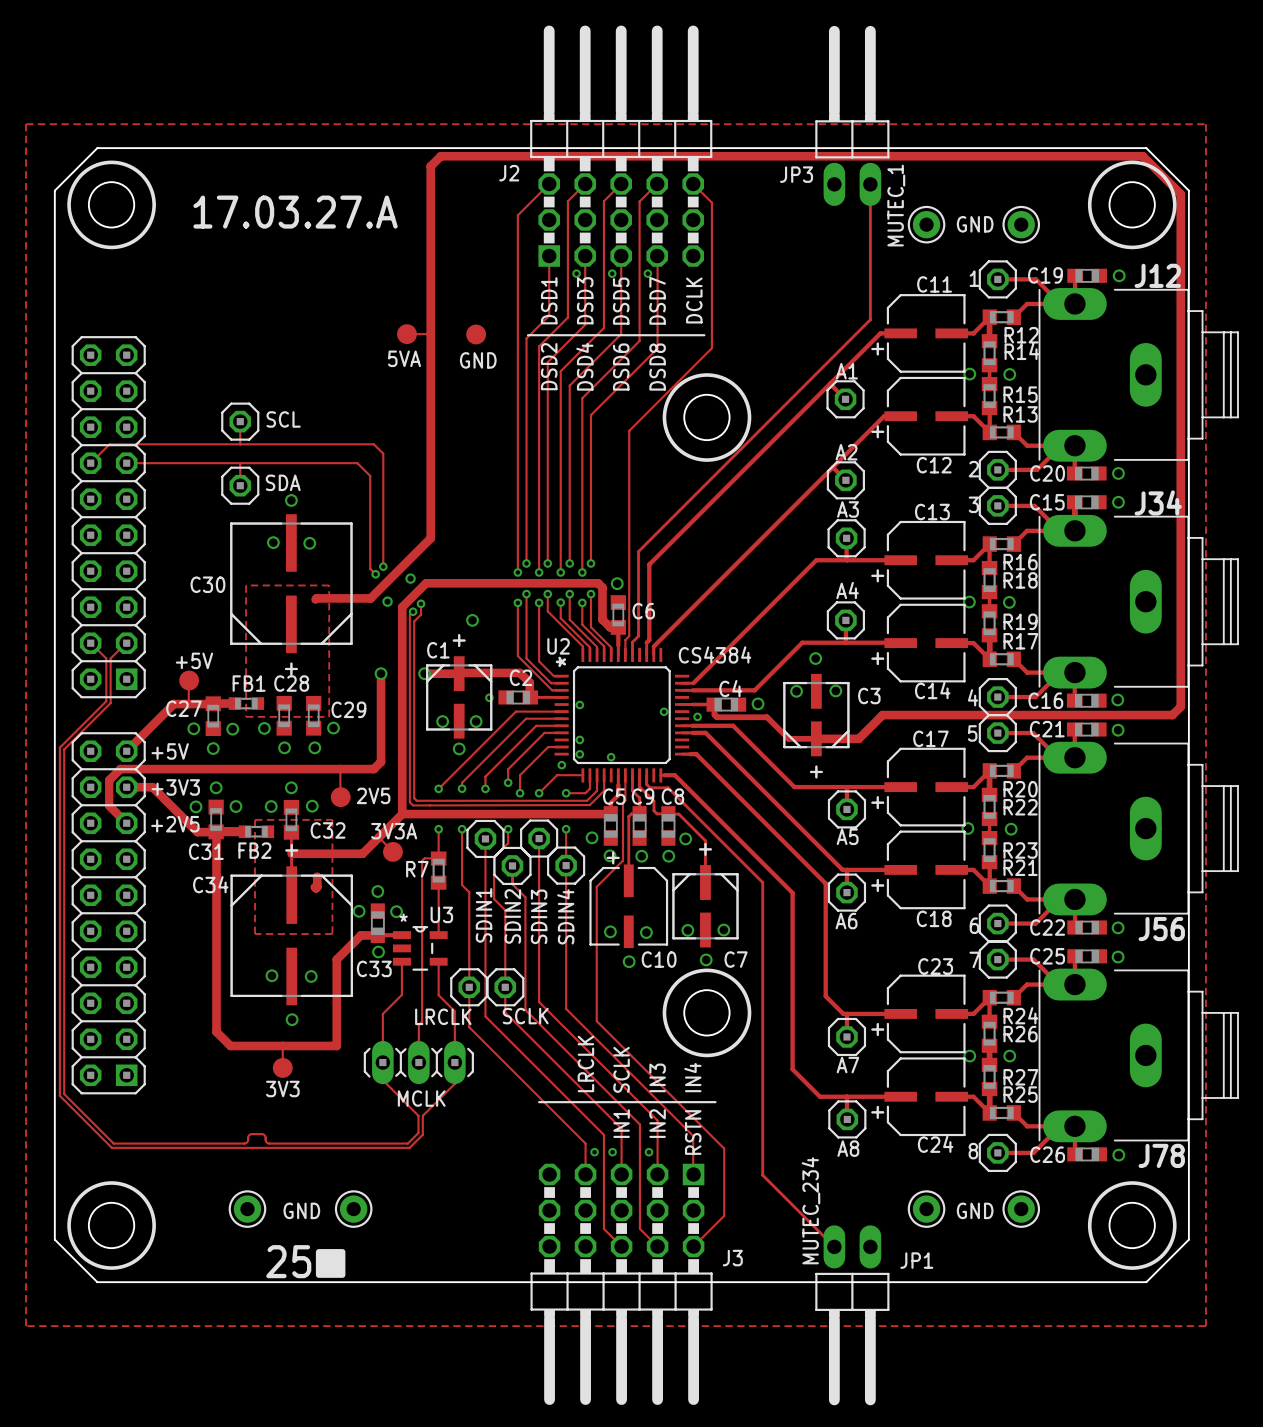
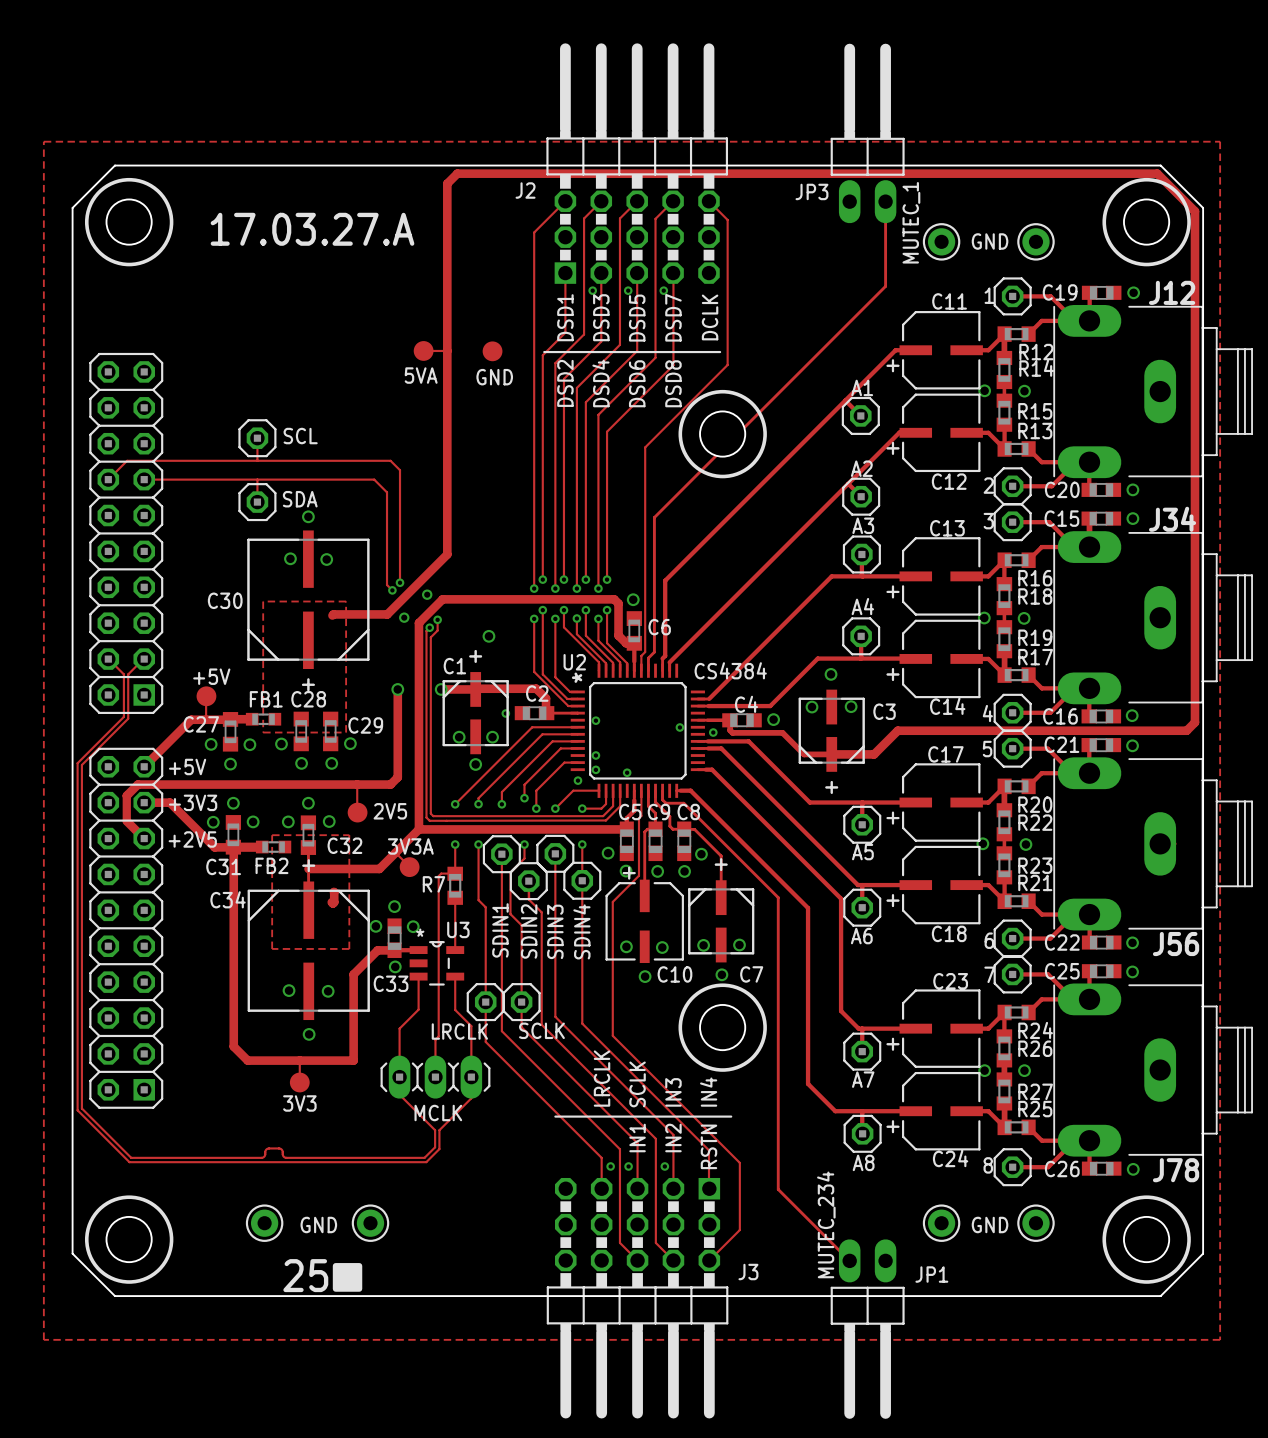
track: (870, 269) (870, 319) (638, 551) -> (885, 286) (654, 517) (654, 567)

